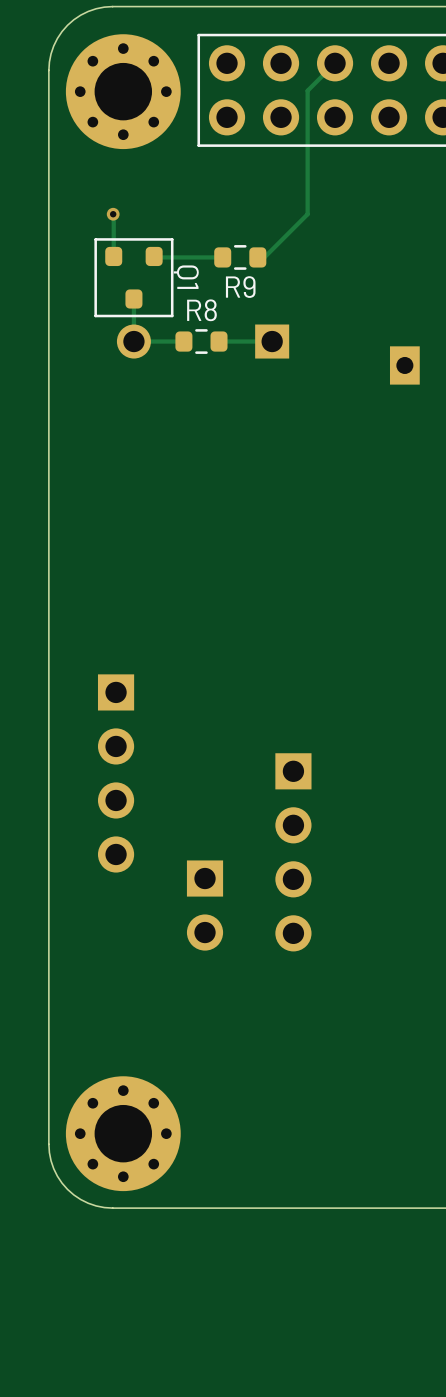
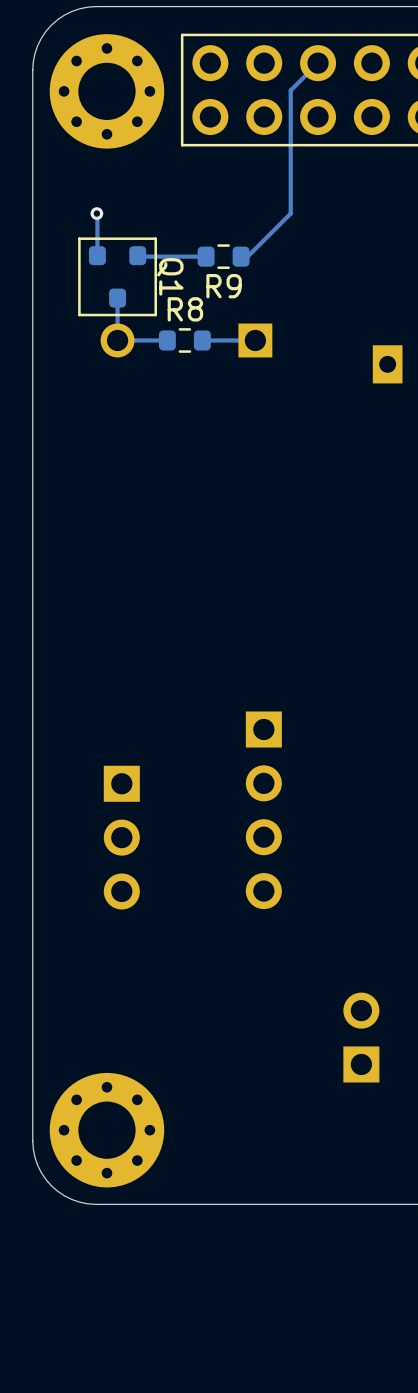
part: (116, 773) -> none
part: none -> (121, 837)
part position: (293, 852) -> (263, 810)
part rotation: 0° (205, 905) -> 180° (361, 1037)
part position: (205, 905) -> (361, 1037)

